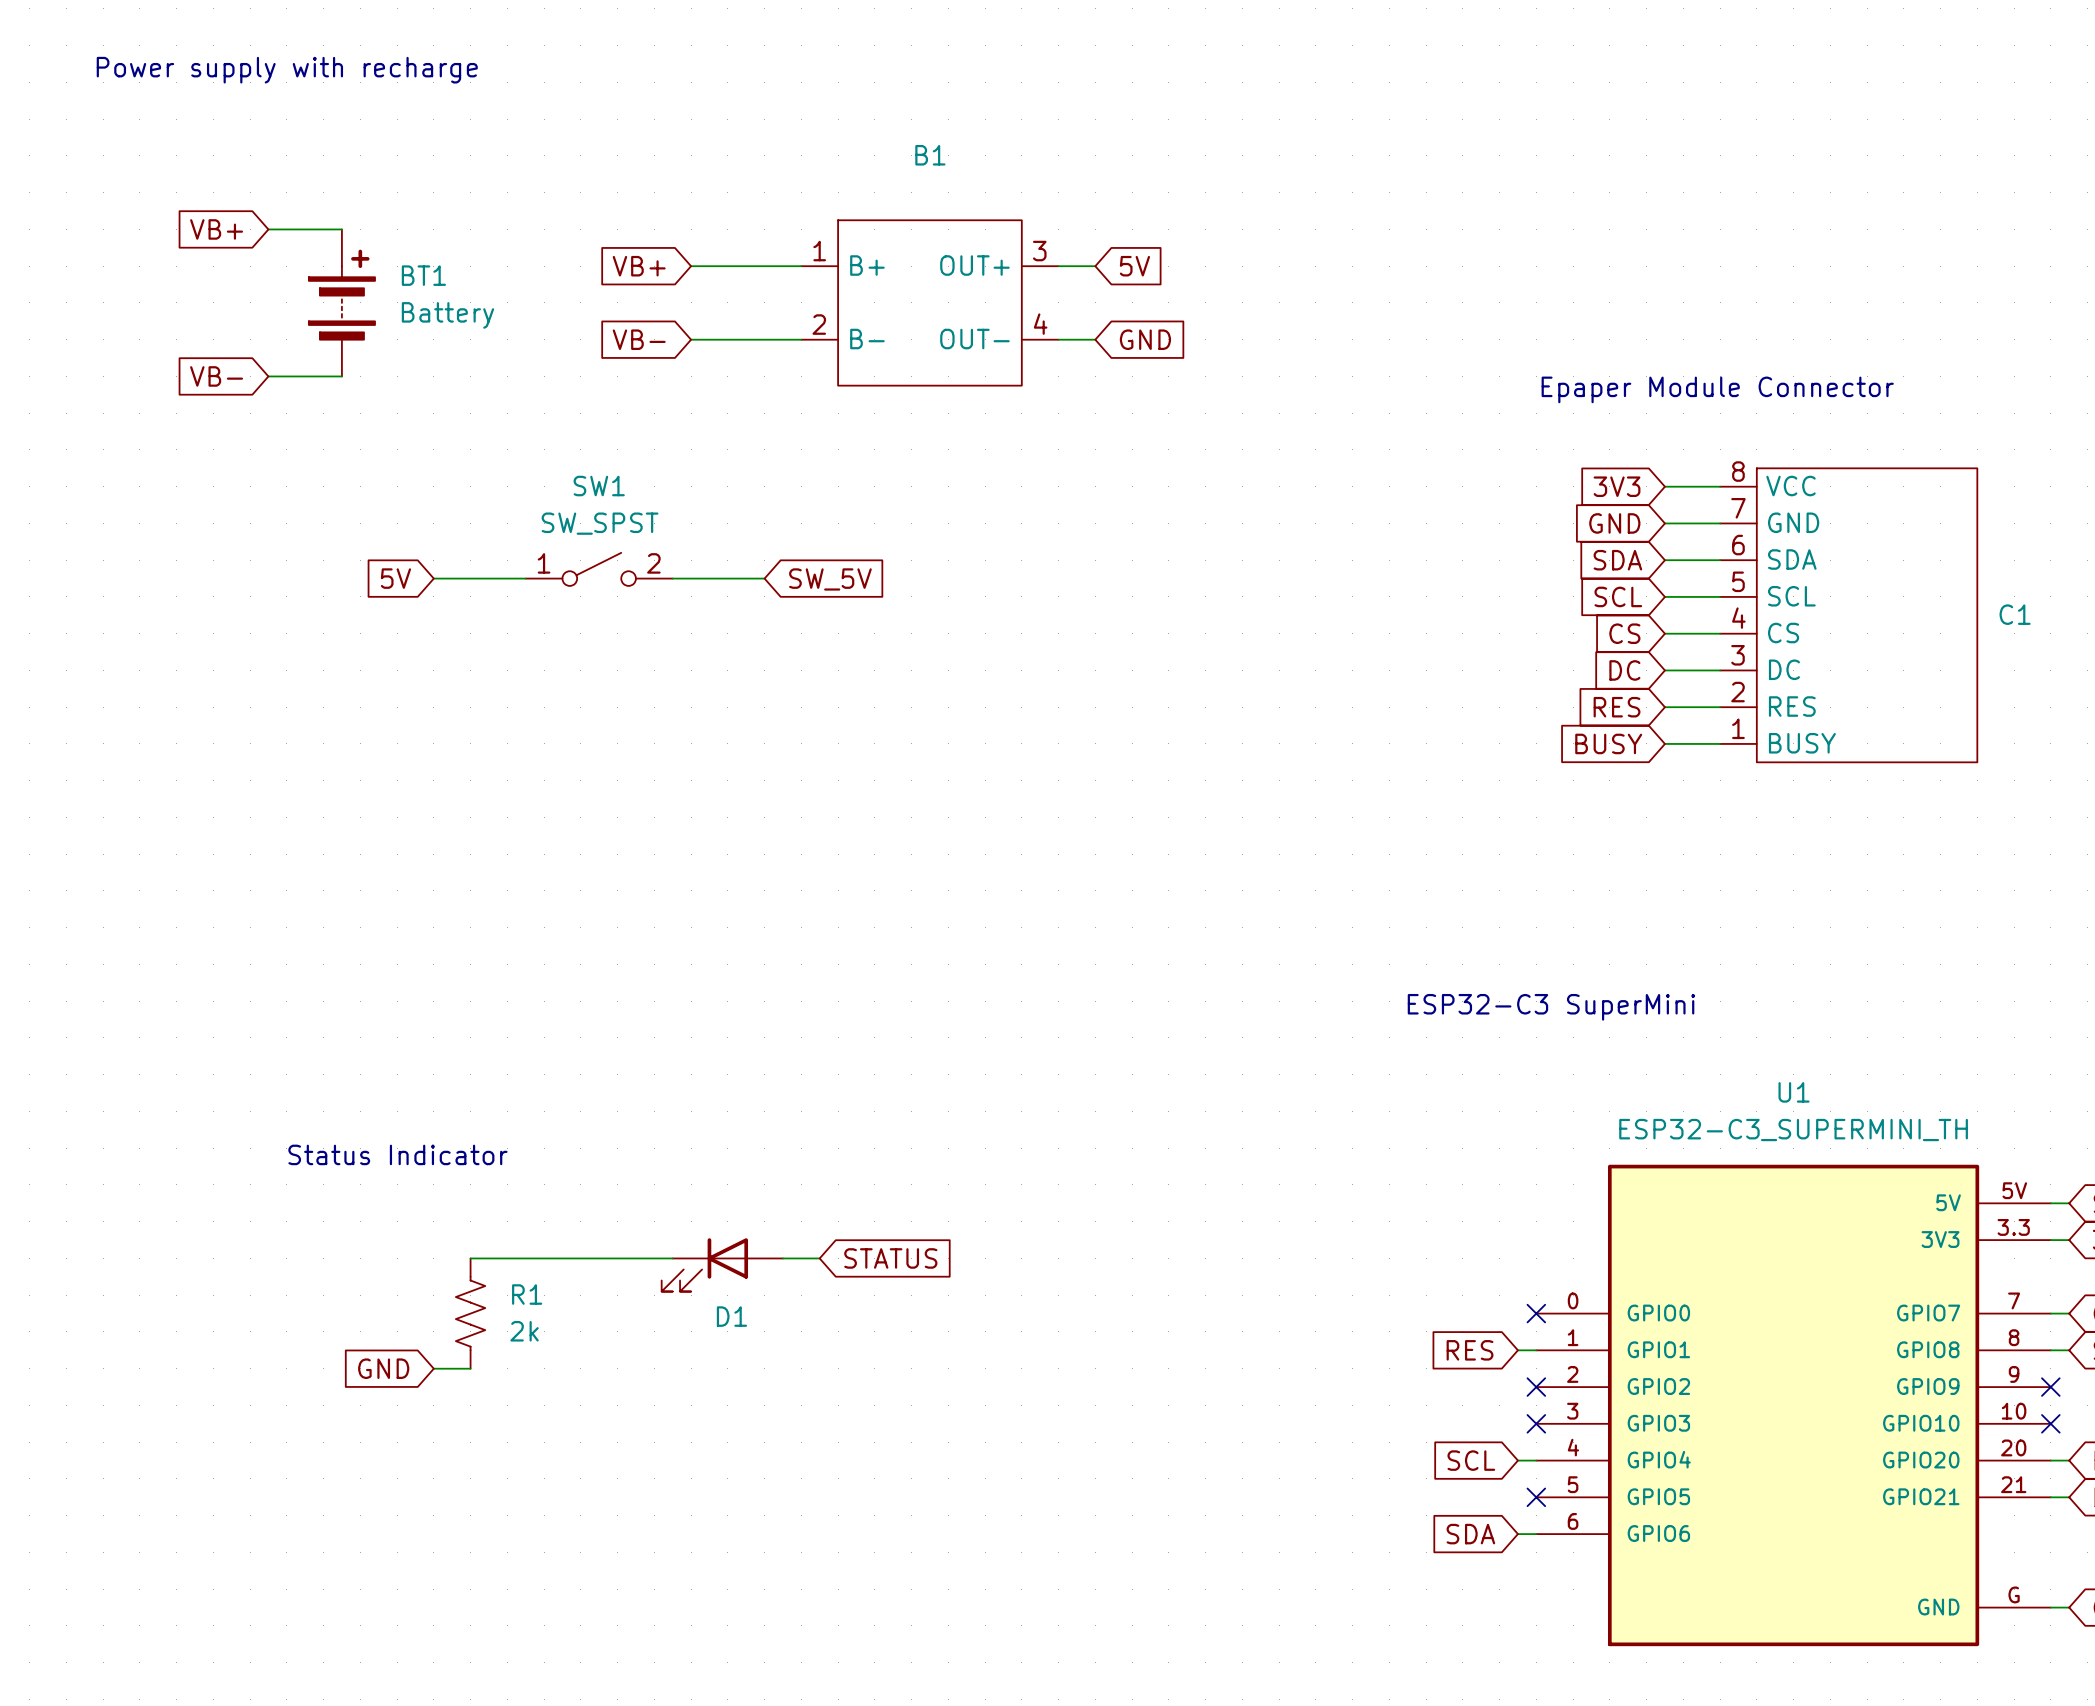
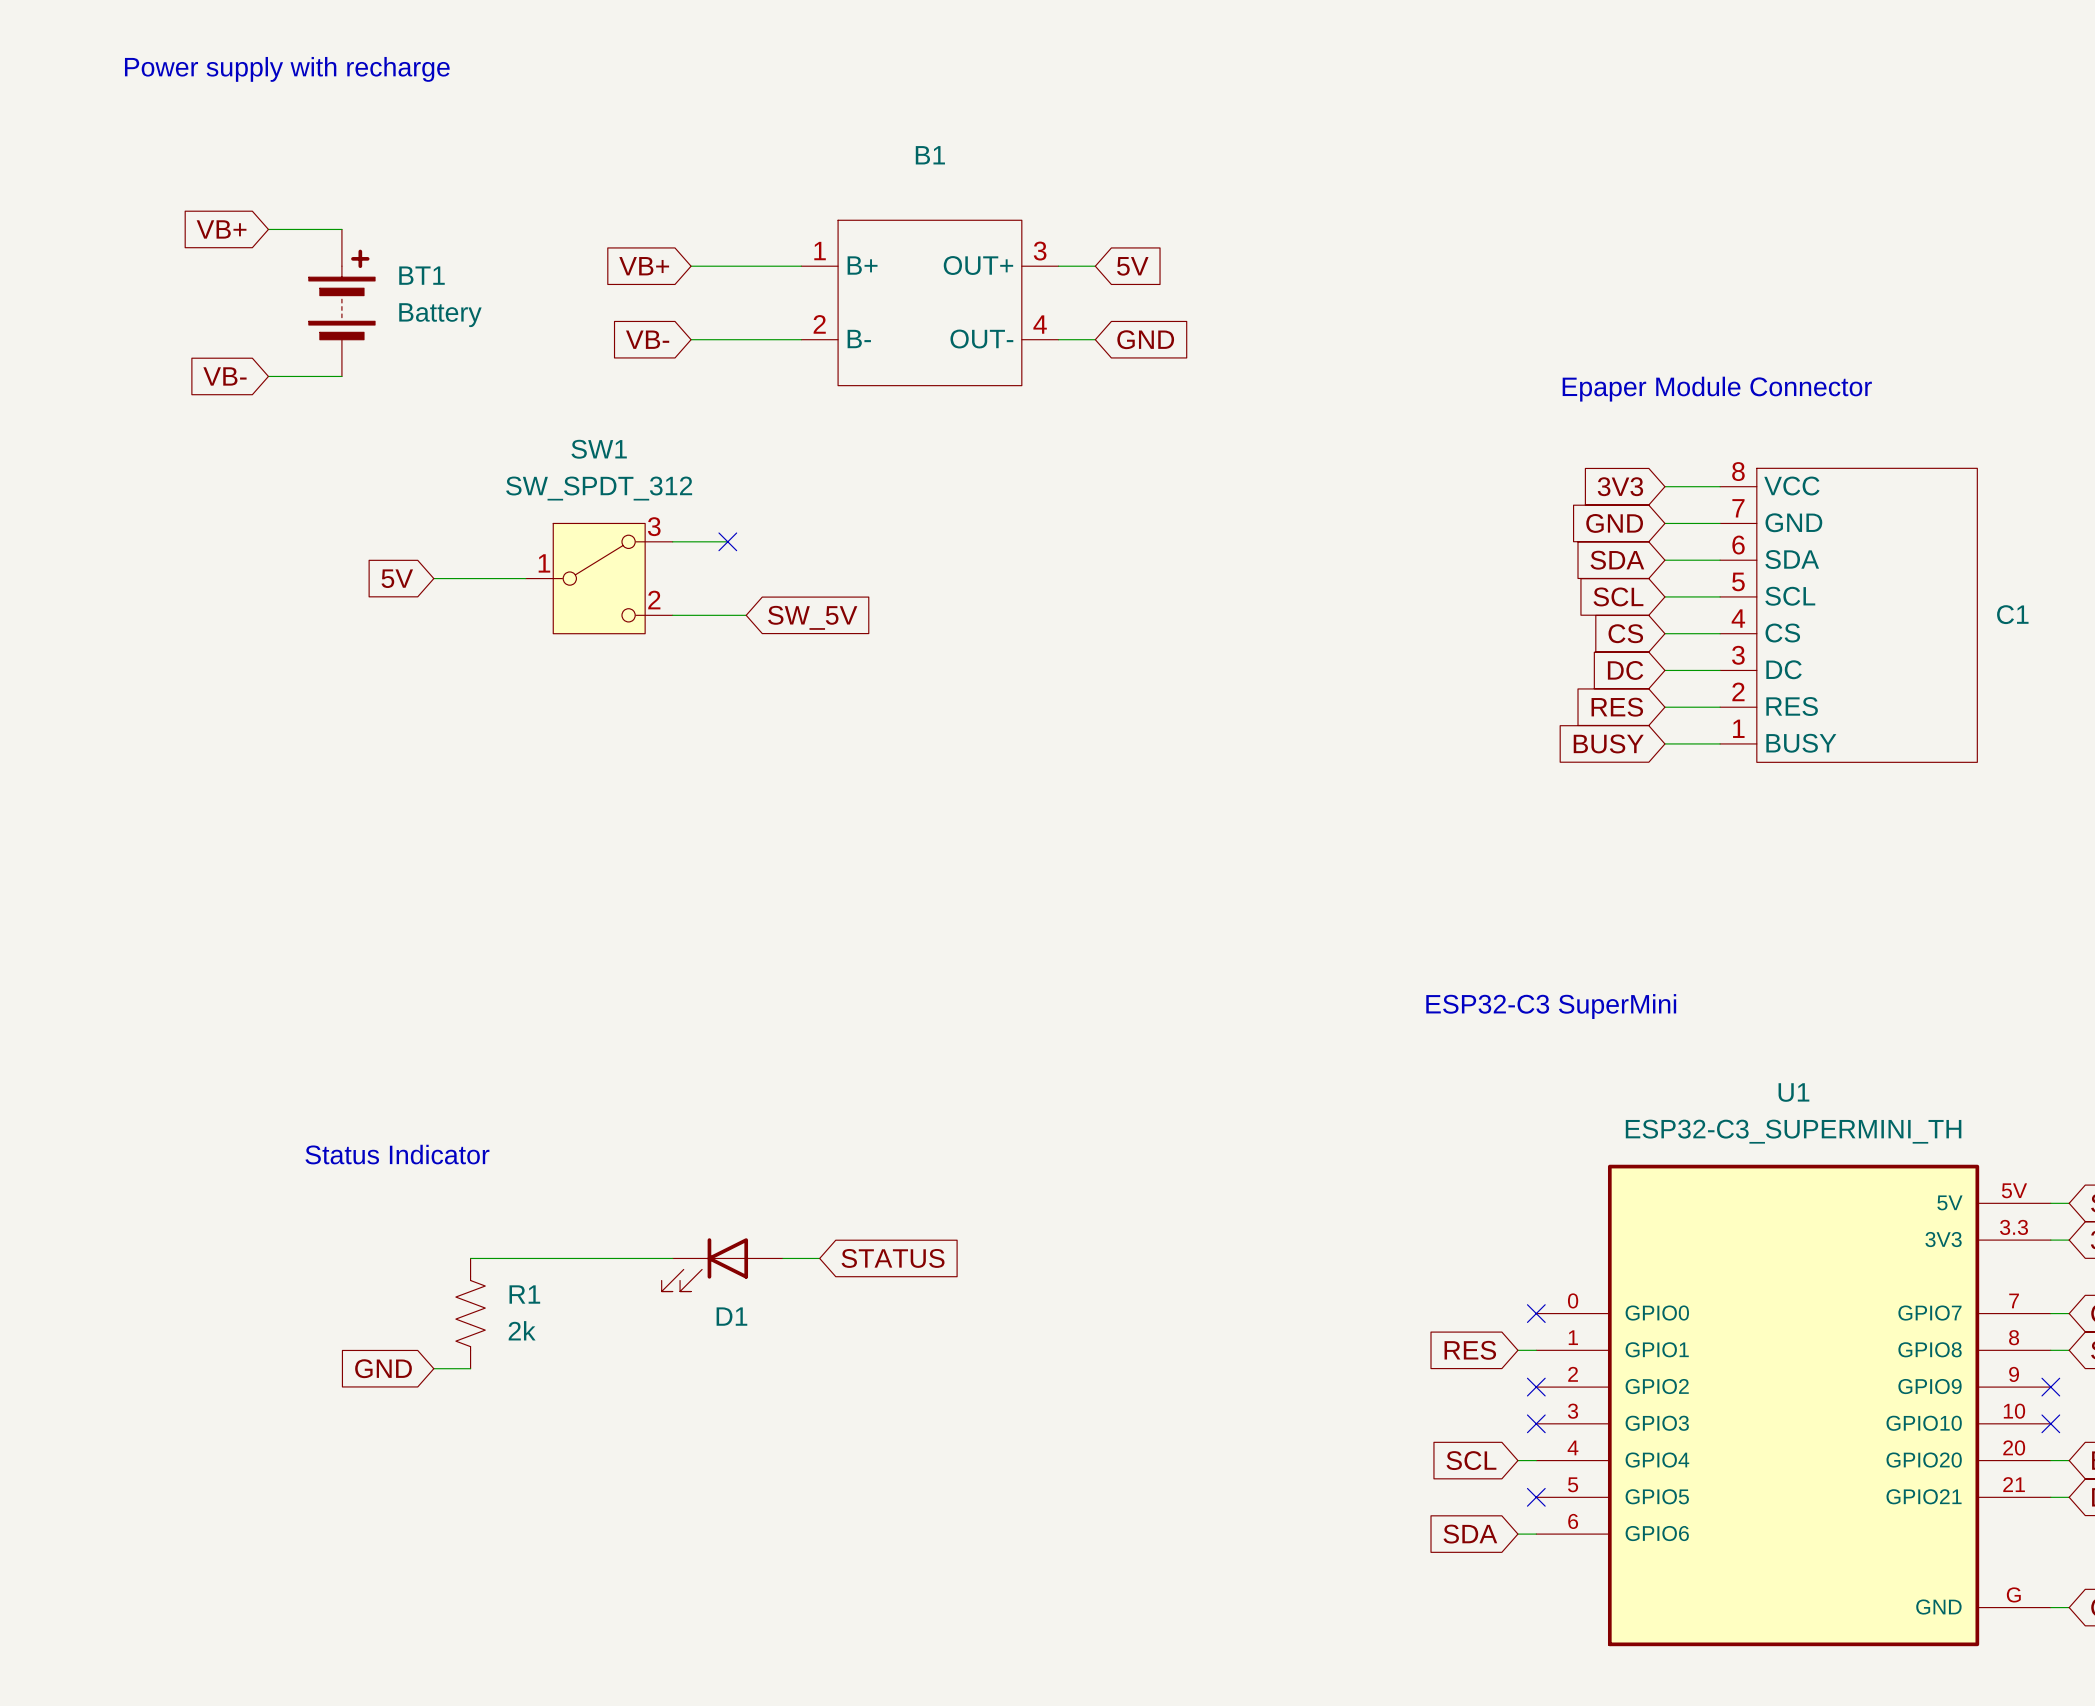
SW1 name position: SW1 (599, 486) -> SW1 (599, 449)
SW1 value: SW_SPST (600, 523) -> SW_SPDT_312 (599, 488)
wire: none -> (672, 541) (727, 541)
no-connect mark: none -> (727, 541)
SW1 symbol: [525, 552, 673, 586] -> [525, 523, 673, 634]
wire: (672, 578) (764, 578) -> none
global label position: SW_5V (830, 579) -> SW_5V (812, 617)
wire: none -> (672, 615) (746, 615)

